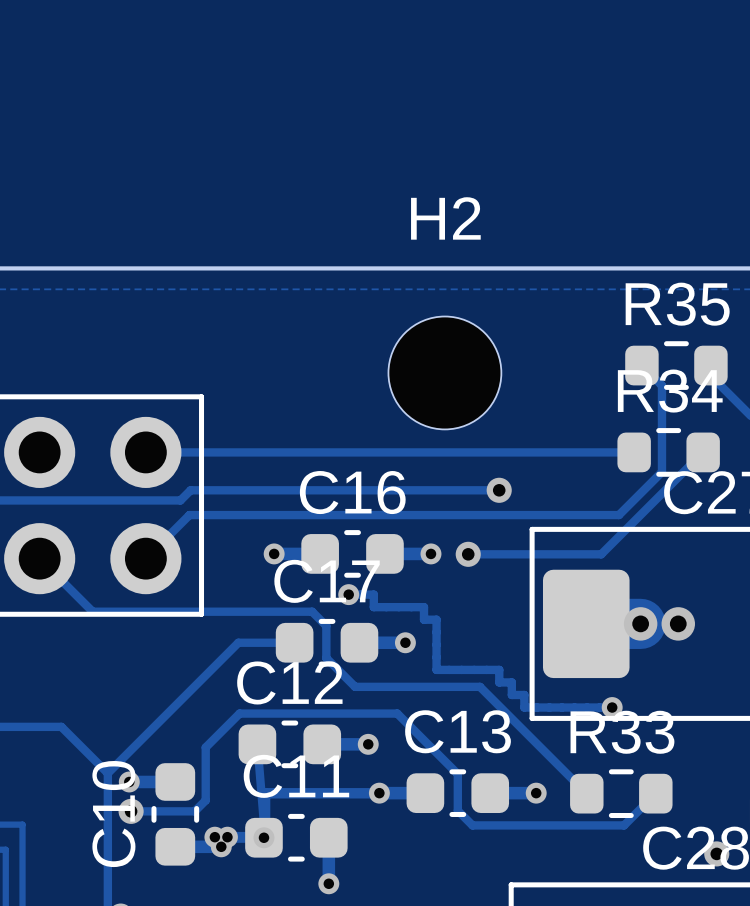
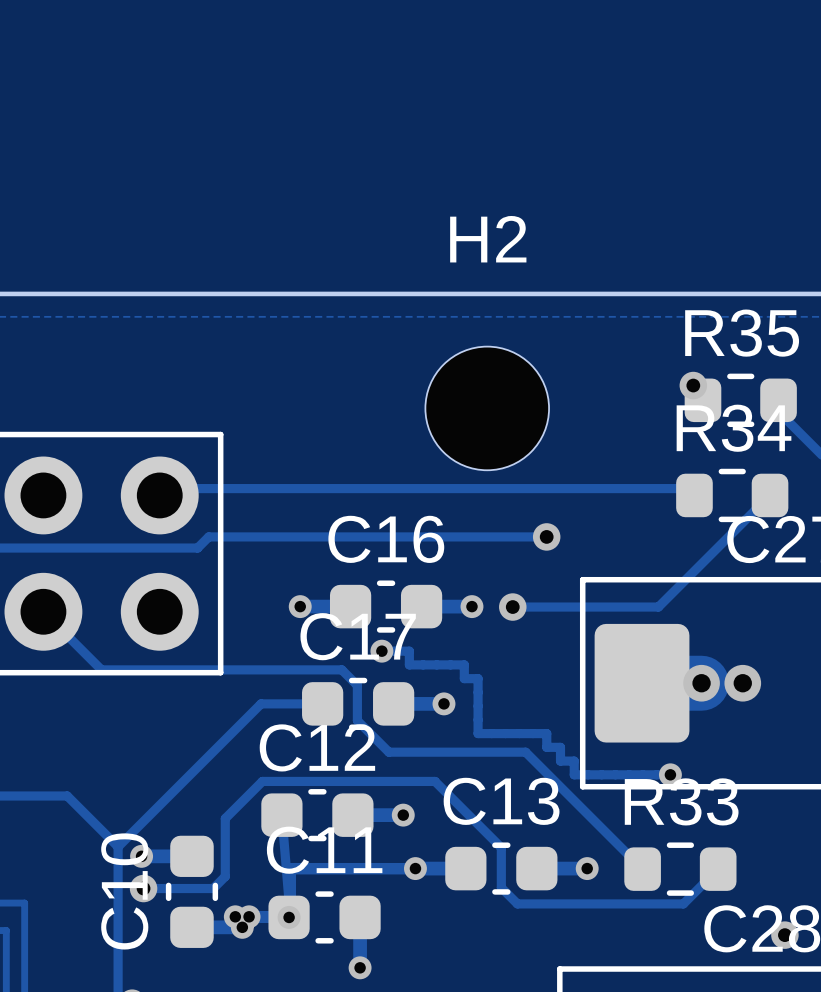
via: none -> (693, 385)
track: (641, 365) (661, 385) (661, 472) (618, 515) (189, 515) (145, 558) -> none
track: none -> (189, 488) (693, 488)
track: (145, 452) (634, 452) -> none

